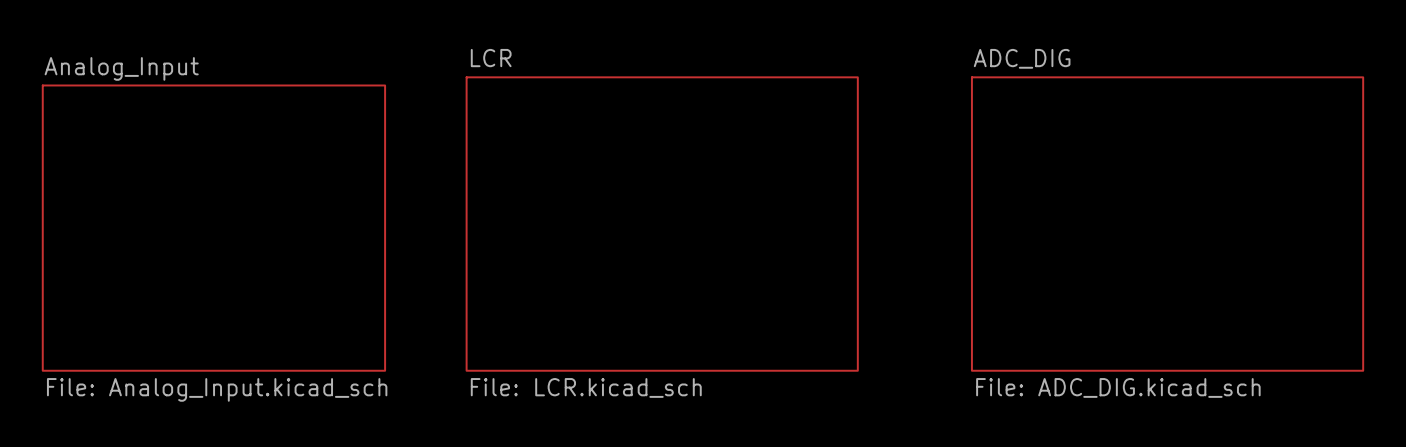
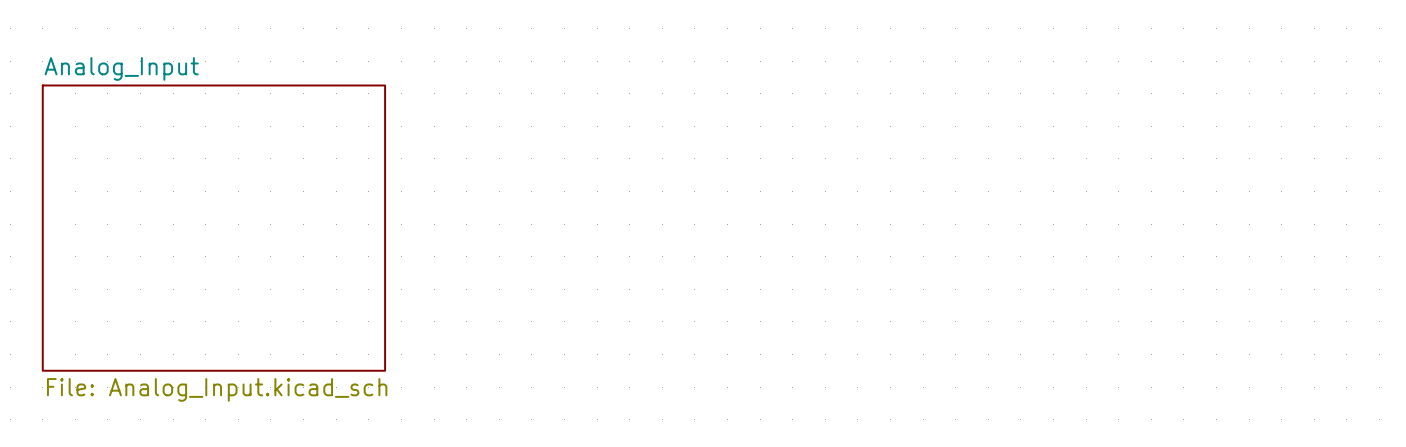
sheet LCR: File: LCR.kicad_sch (662, 224) -> none
sheet ADC_DIG: File: ADC_DIG.kicad_sch (1167, 224) -> none

